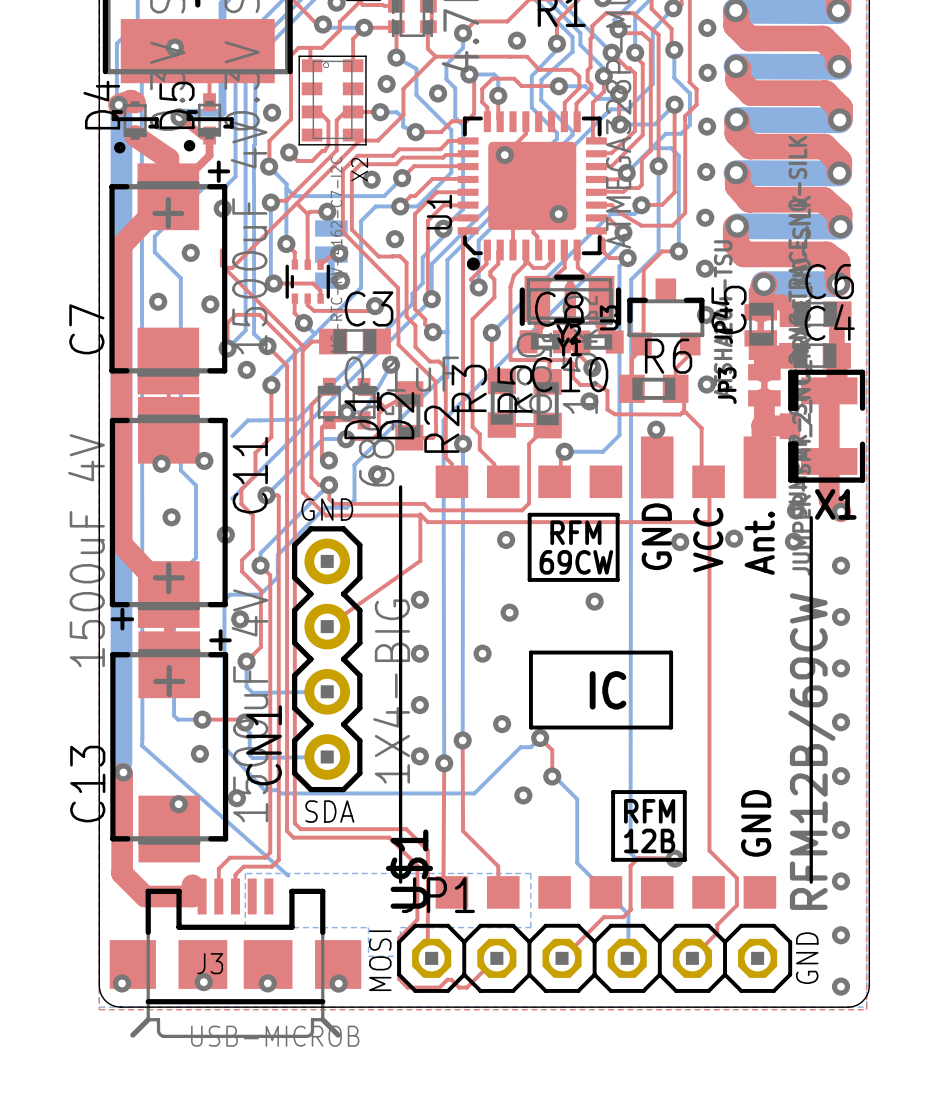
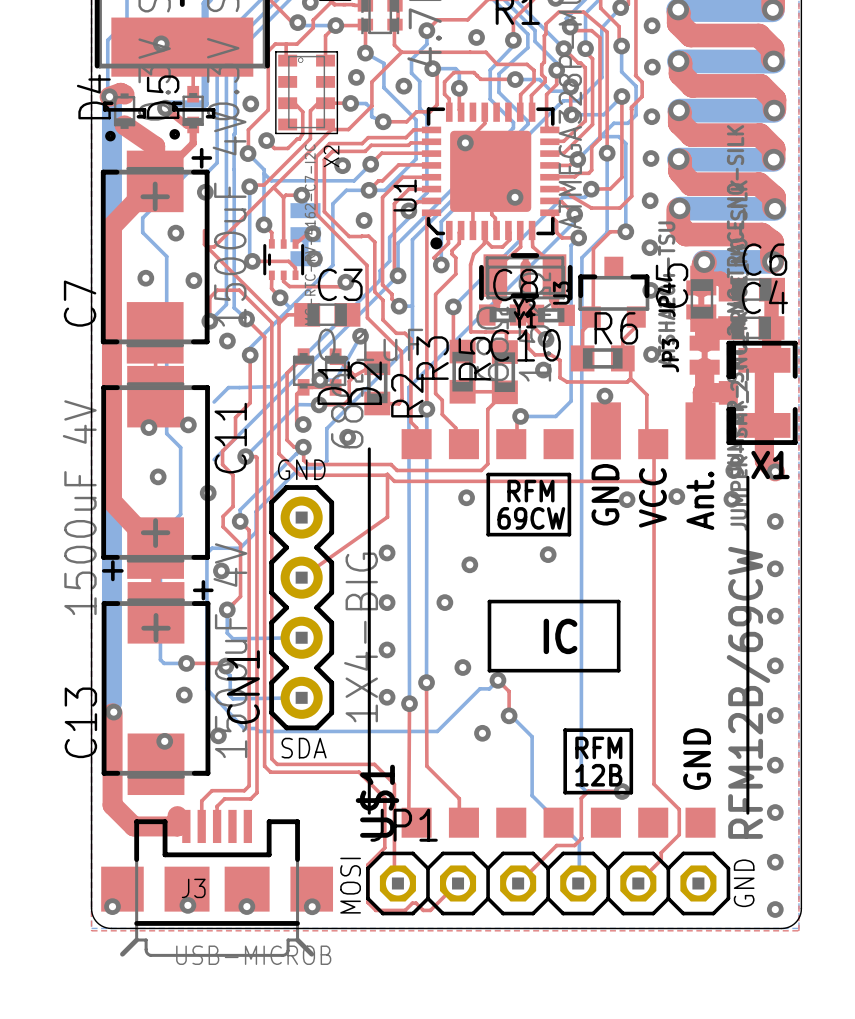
bottom track: (174, 47) (141, 47) (141, 745) (288, 875) -> none
bottom zone outline: (245, 873) (245, 927) (368, 927) (368, 956) (400, 956) (400, 927) (530, 927) (530, 873) (245, 873) -> none

